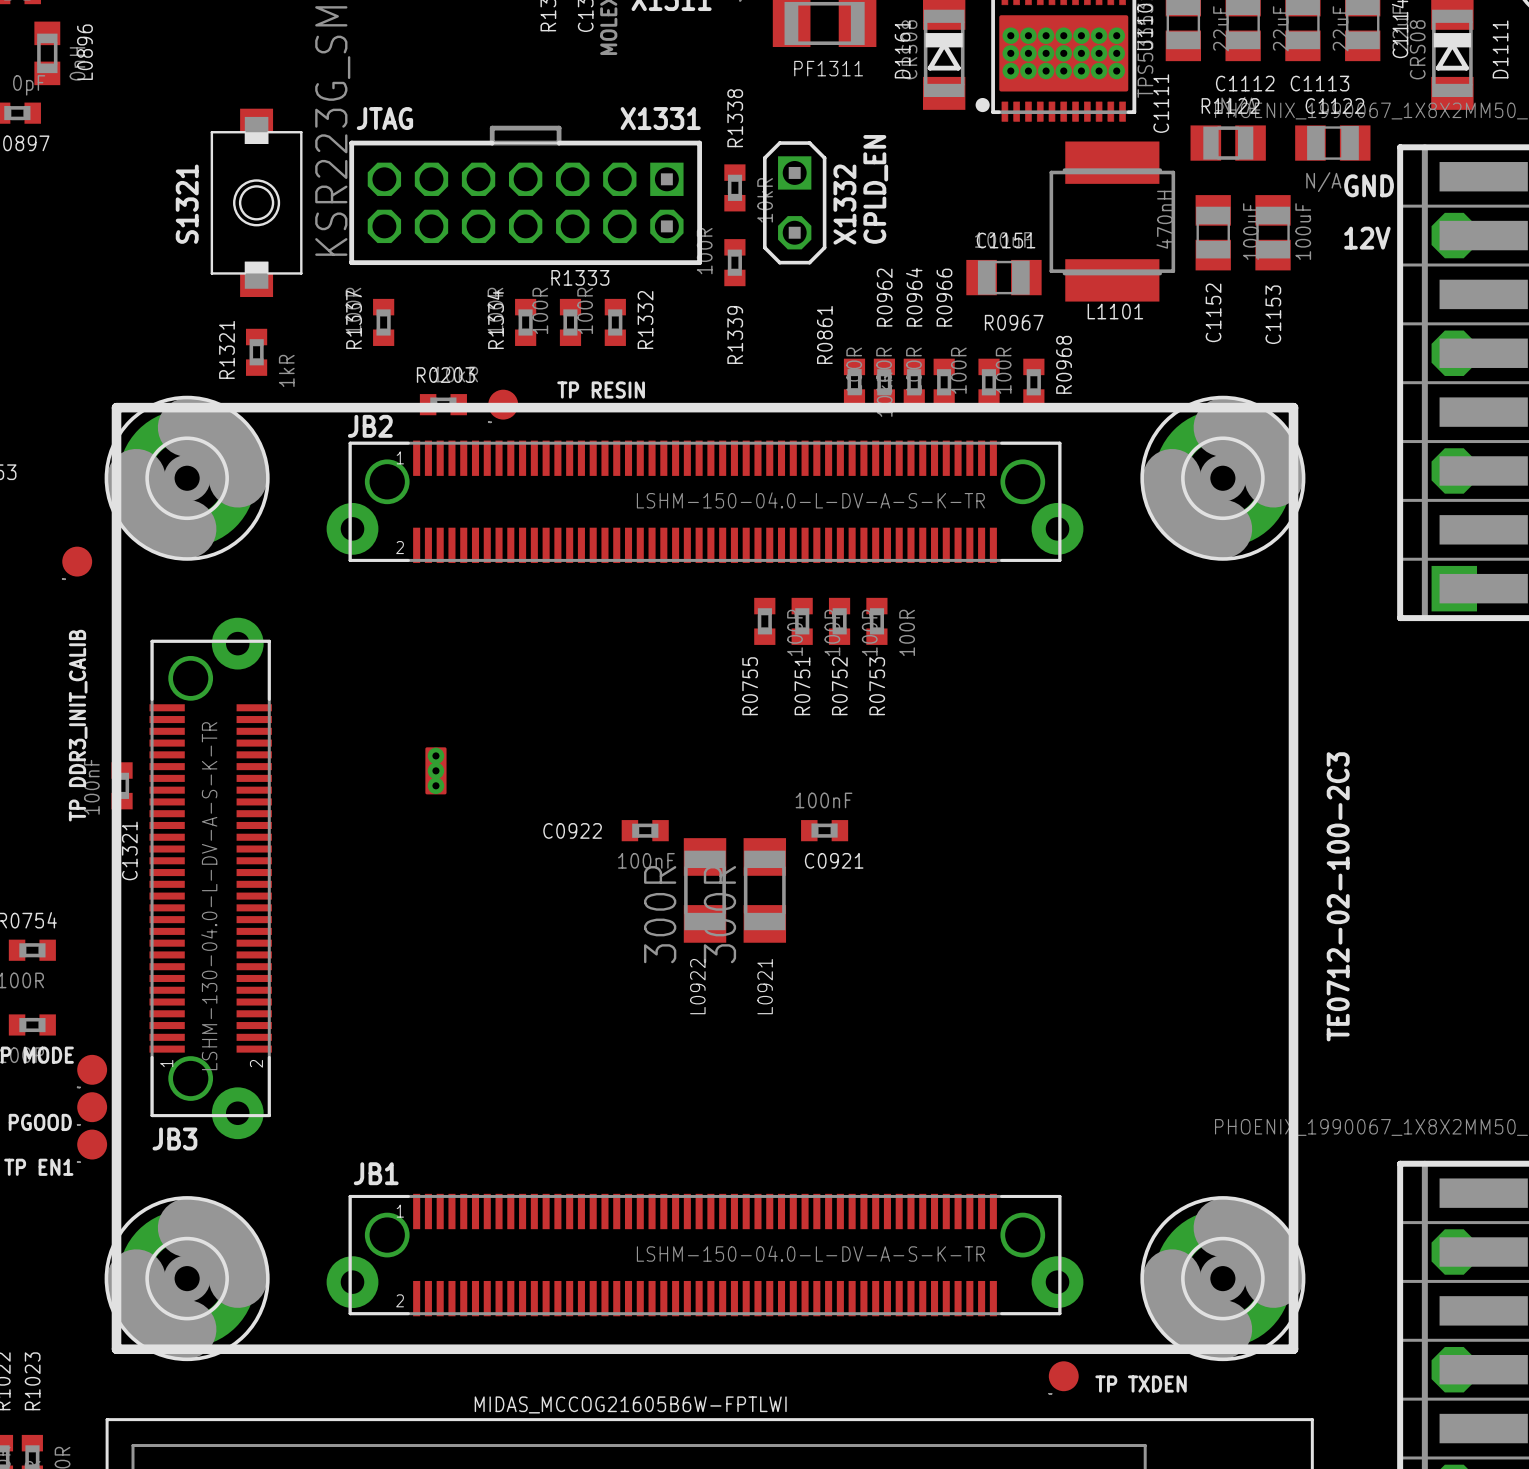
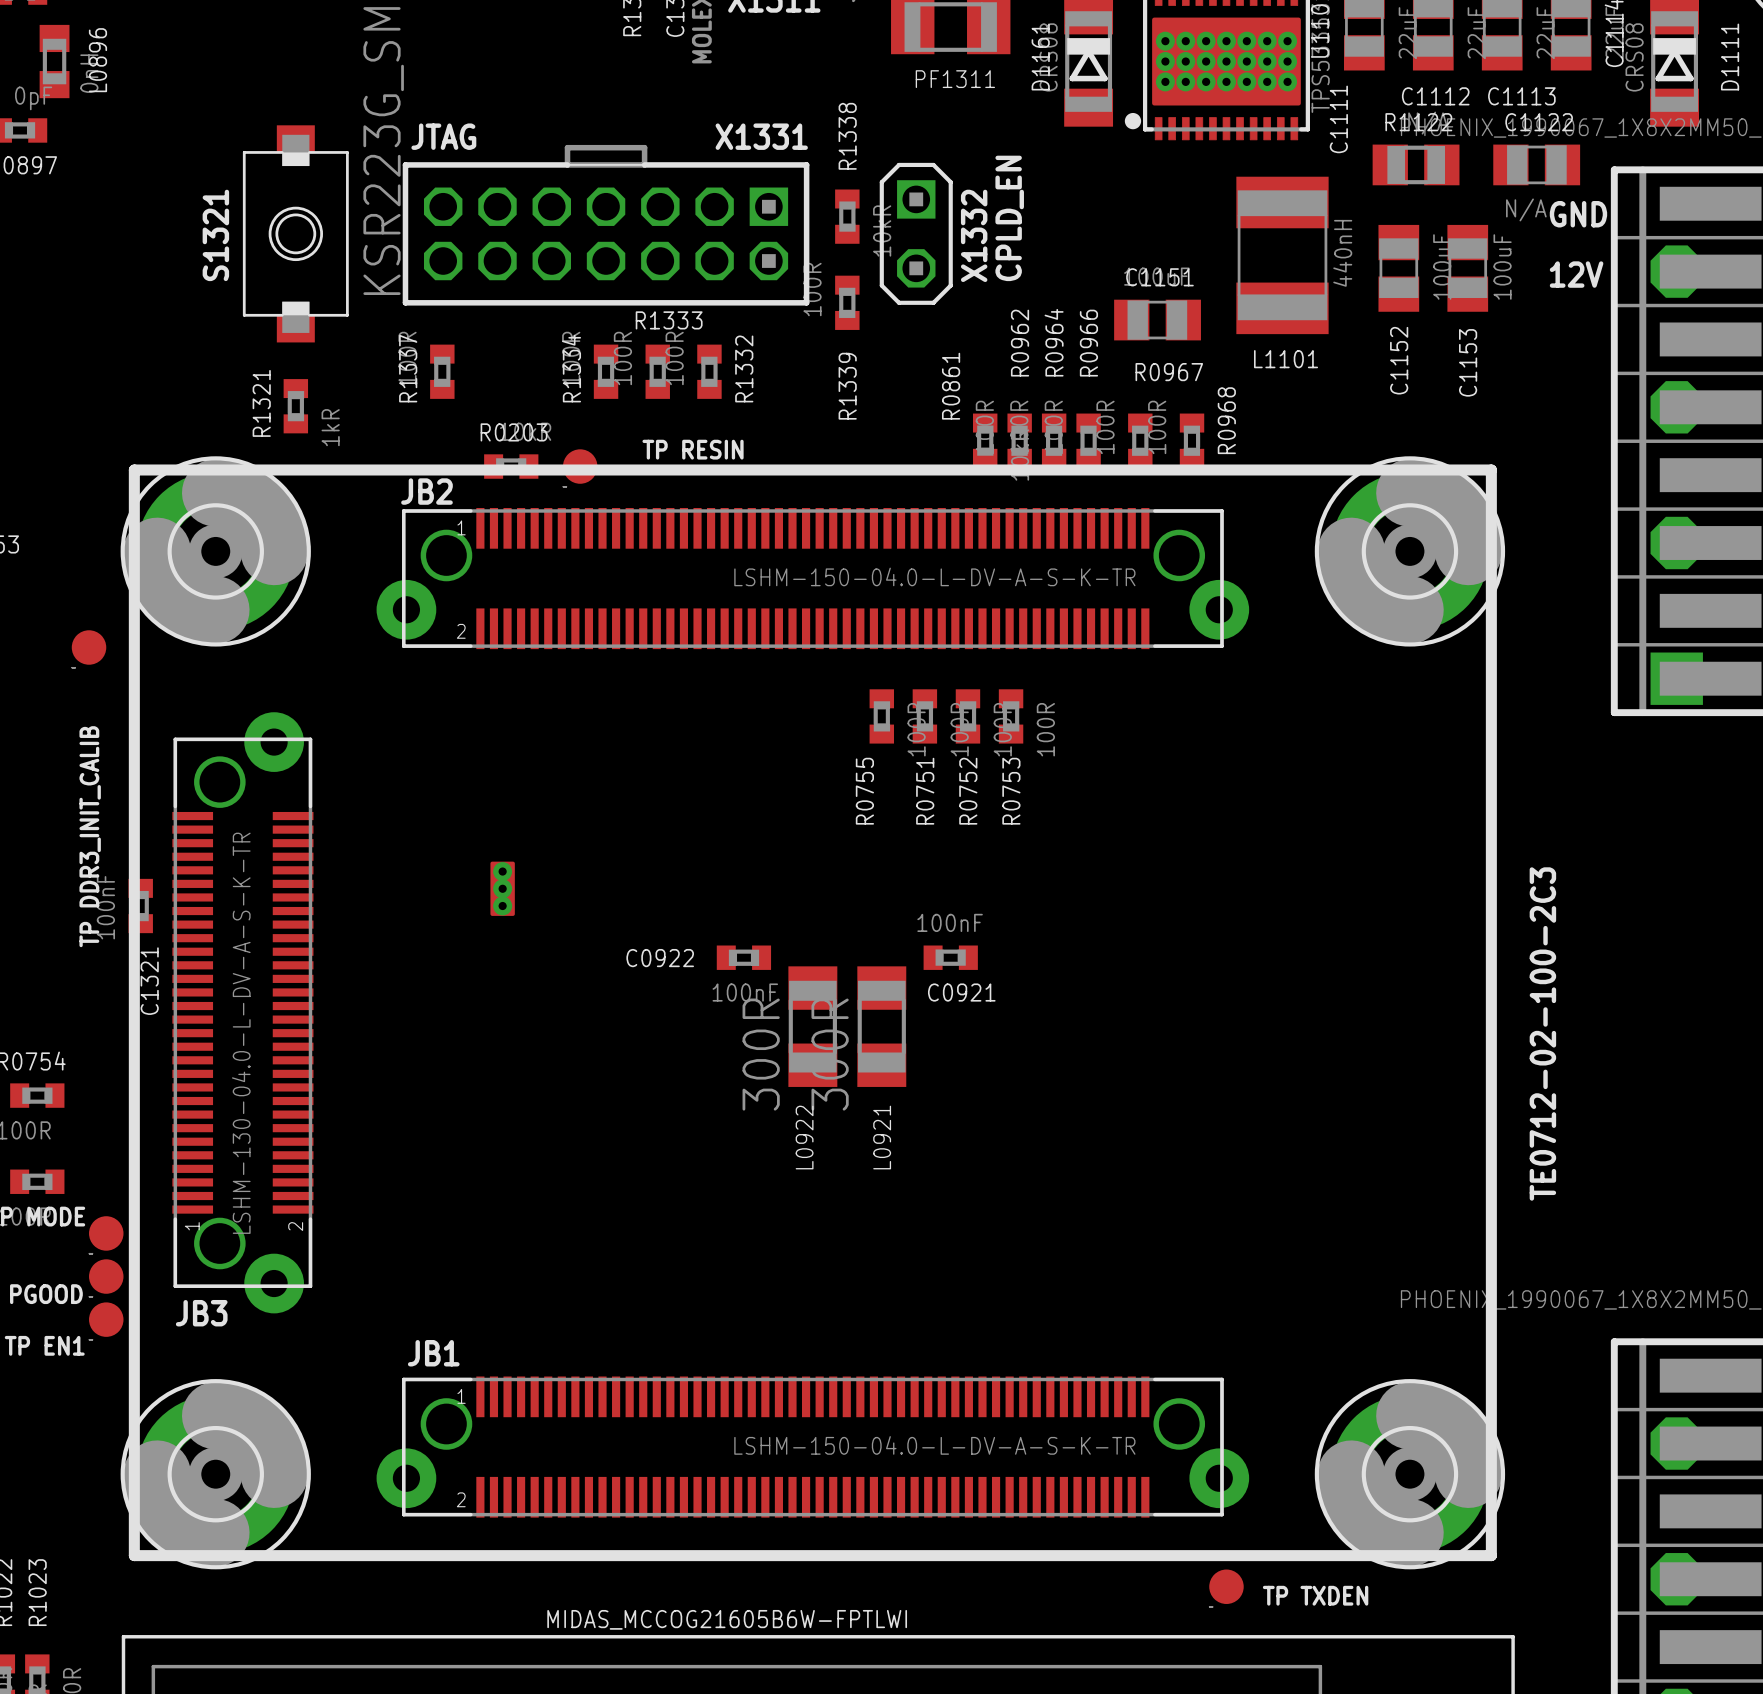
L1101 footprint: [1049, 141, 1176, 302] -> [1236, 176, 1329, 335]
L1101 value: 470nH (1164, 219) -> 440nH (1342, 253)

